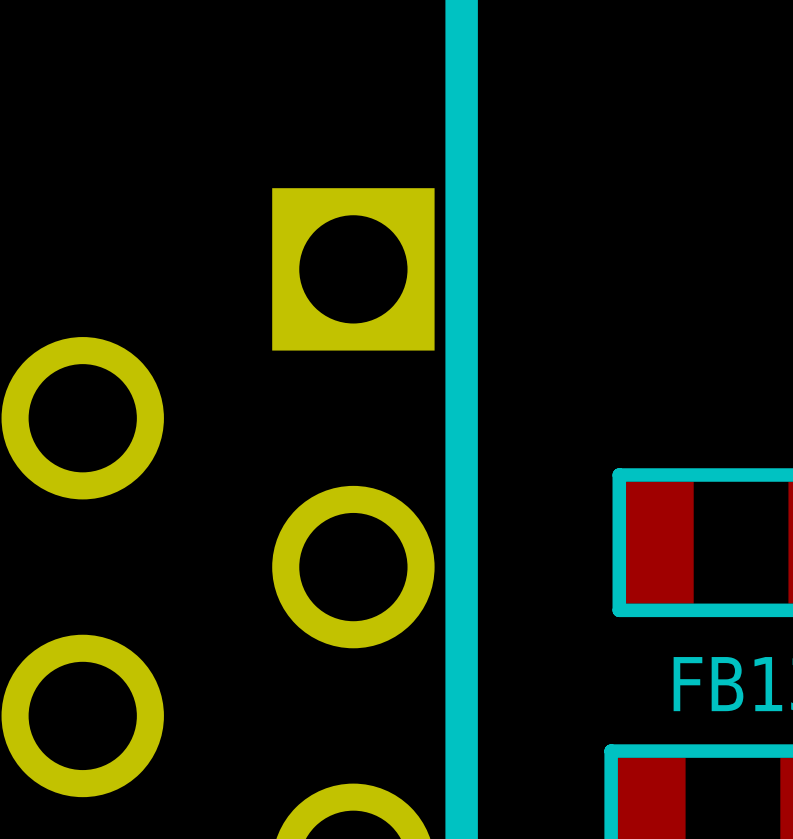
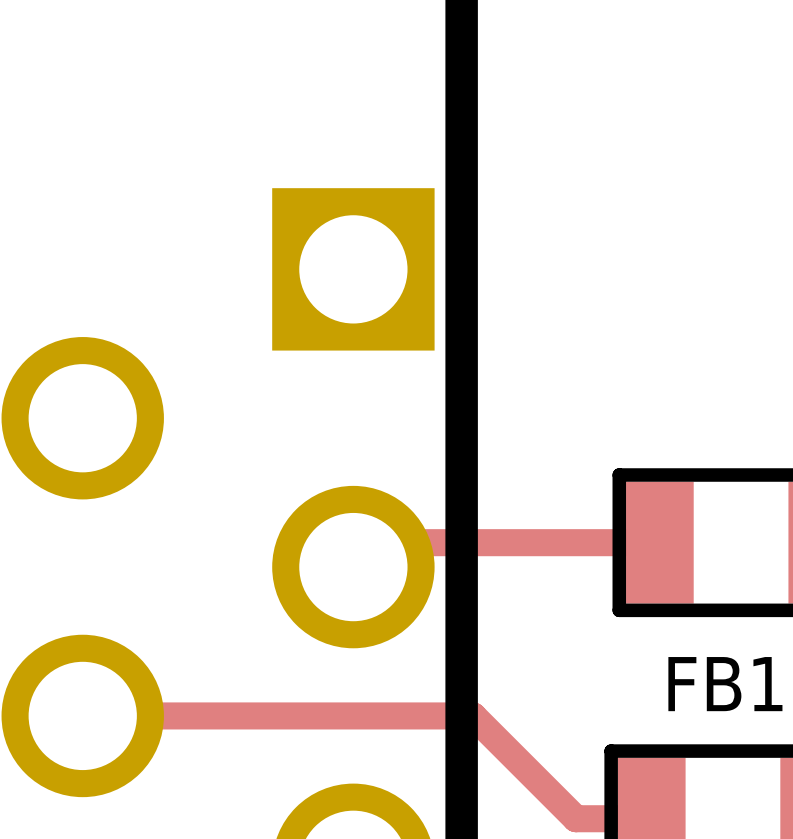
top track: none -> (659, 542) (377, 542) (353, 567)
top track: none -> (82, 715) (473, 715) (575, 818) (651, 818)

